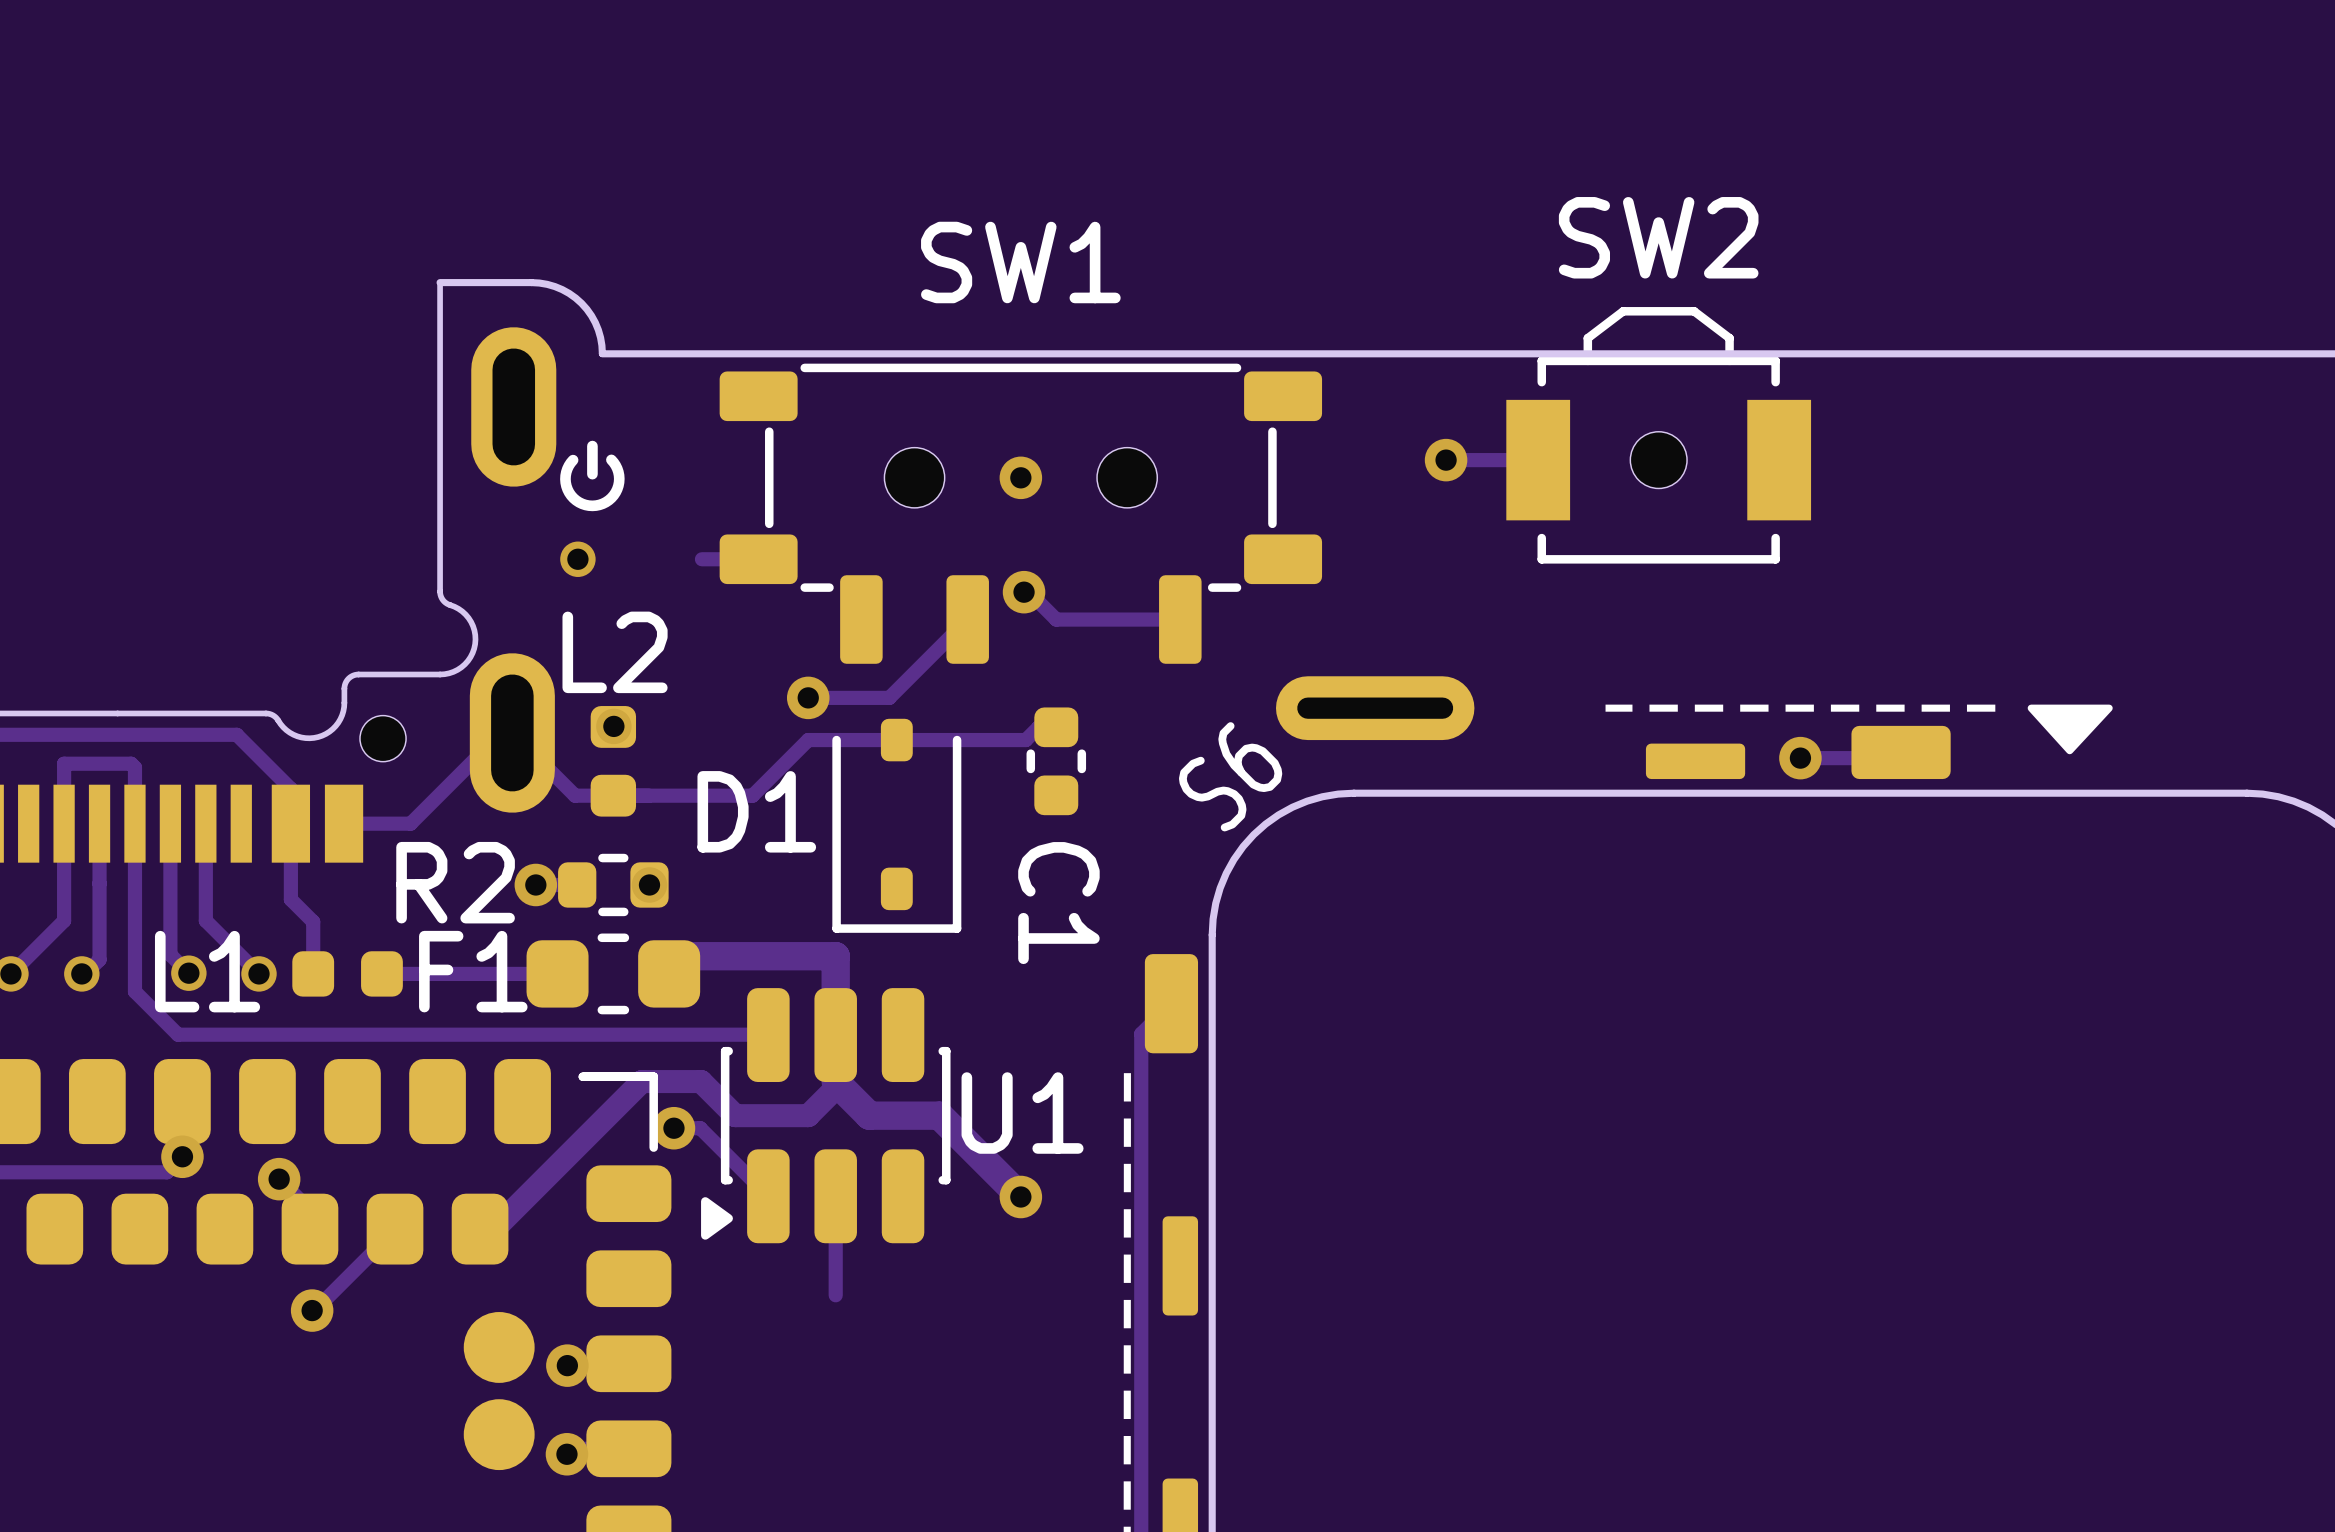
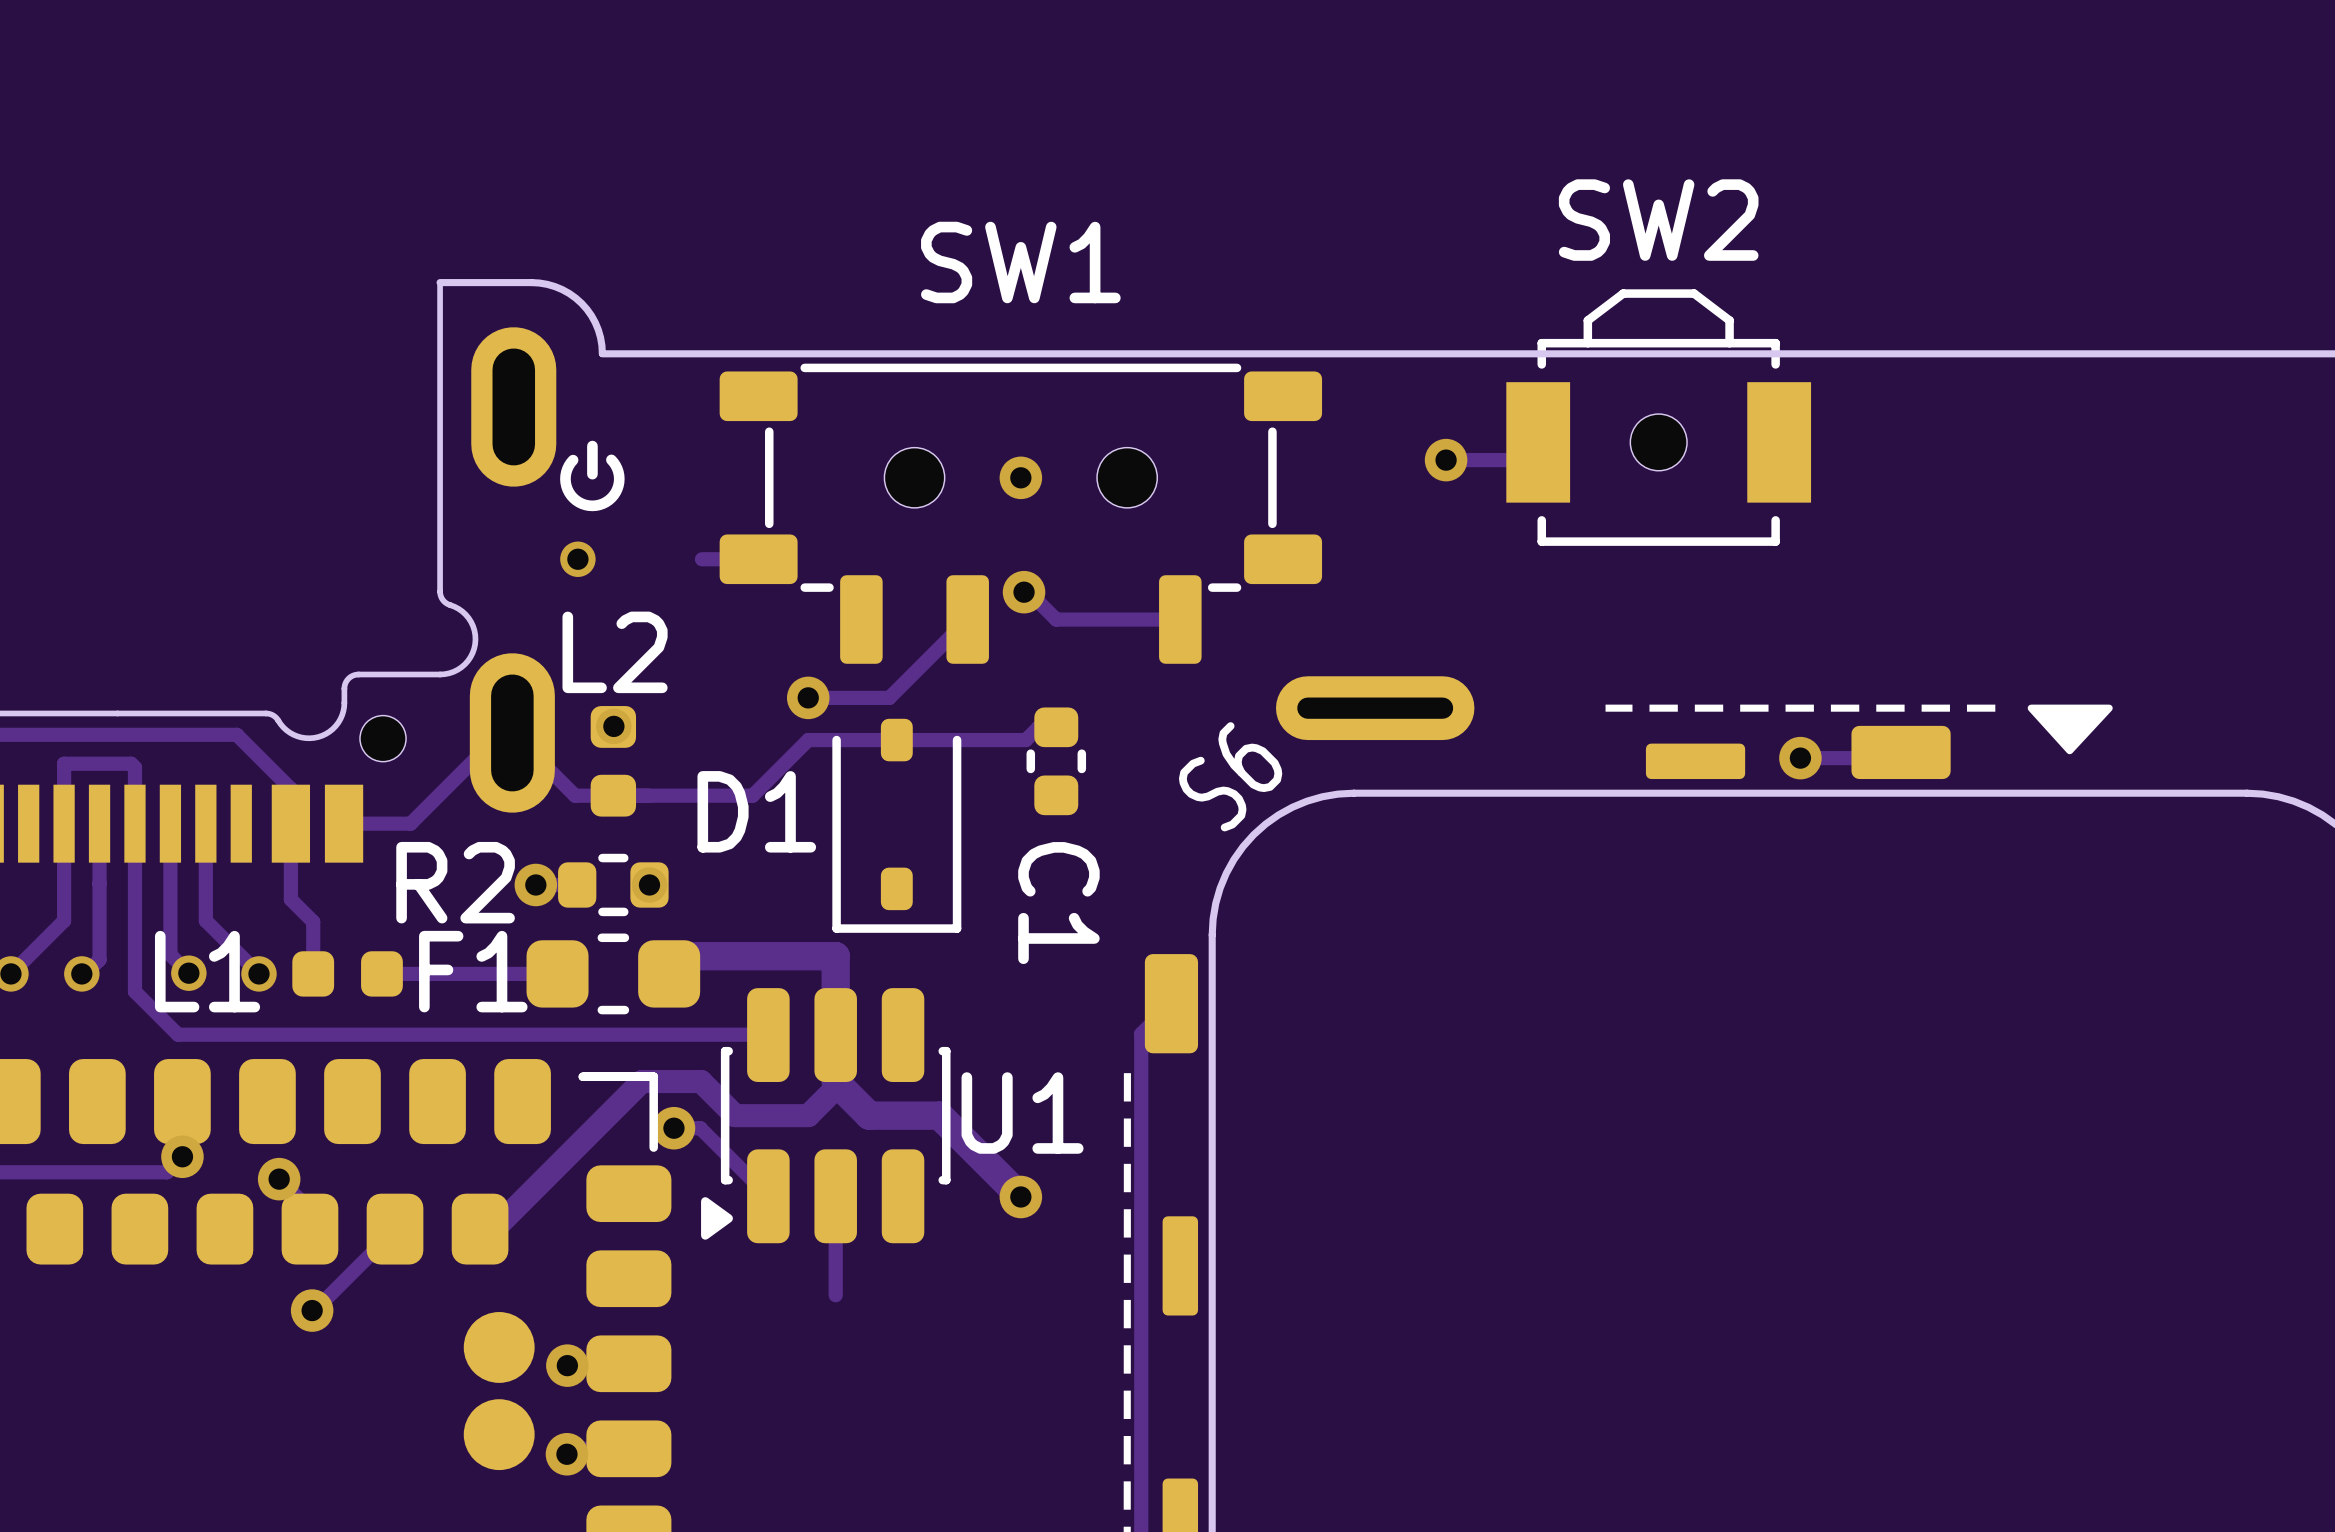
SW2 position: (1658, 435) -> (1658, 417)

